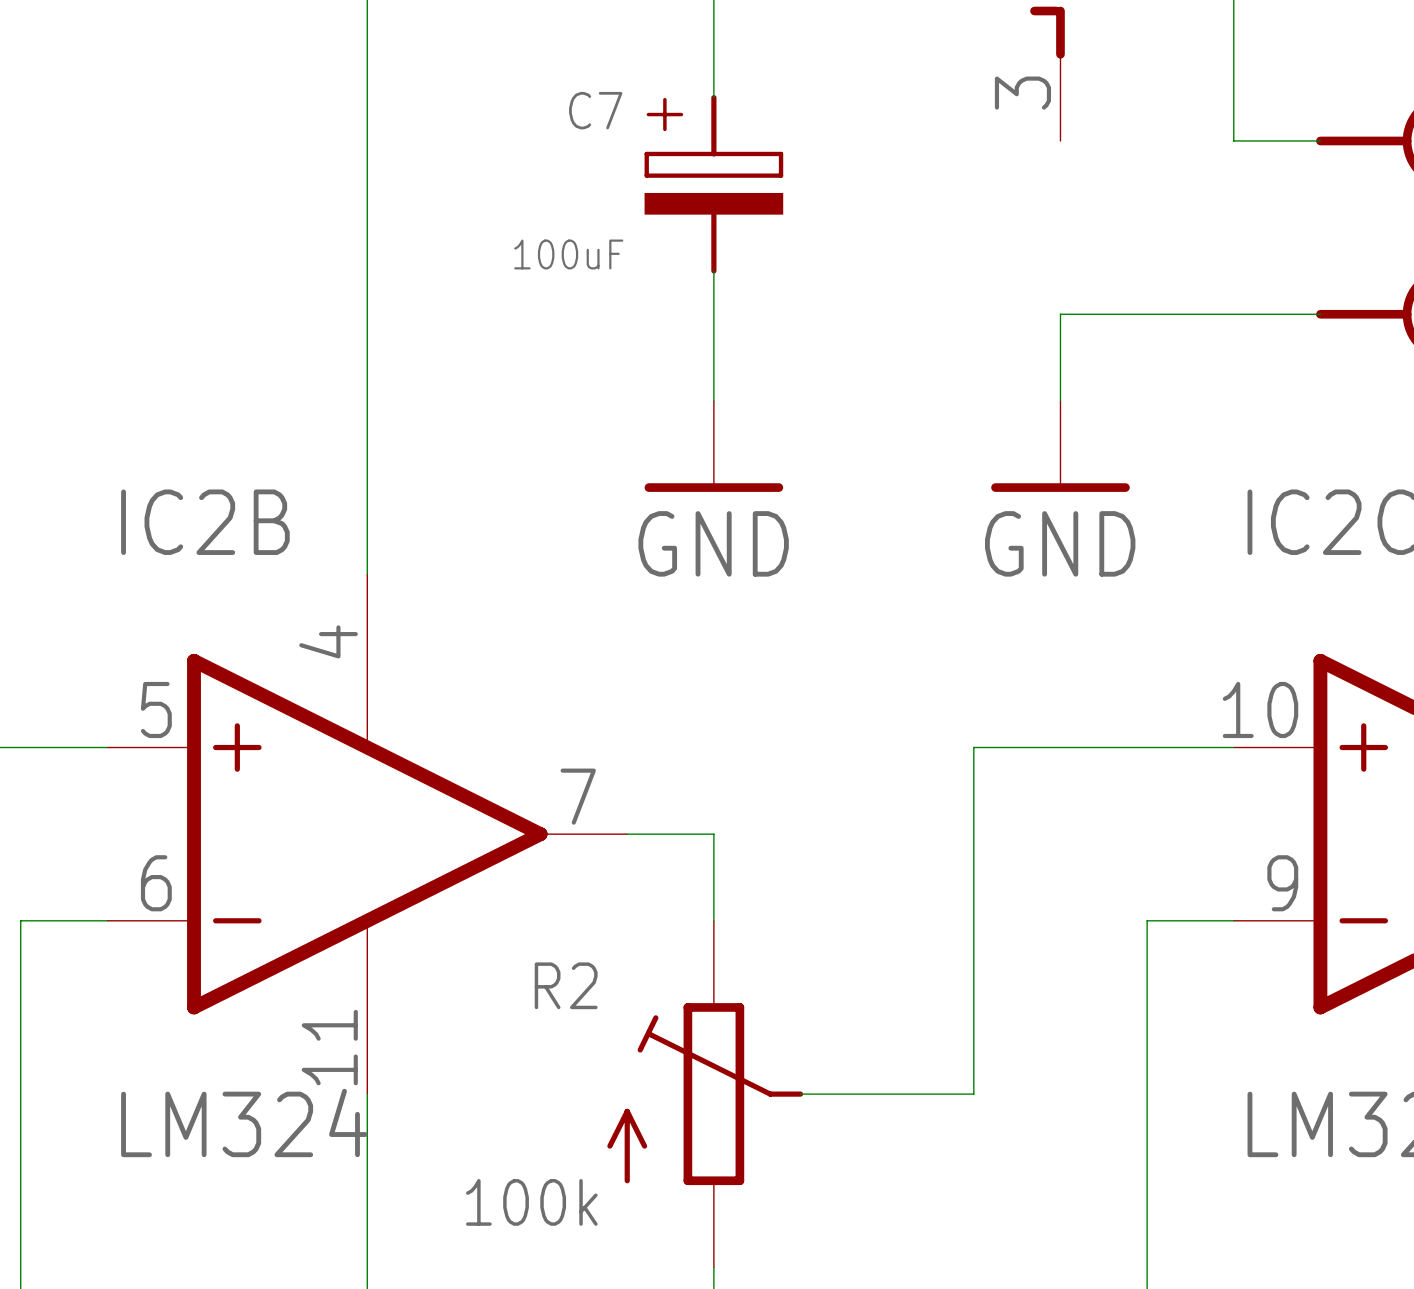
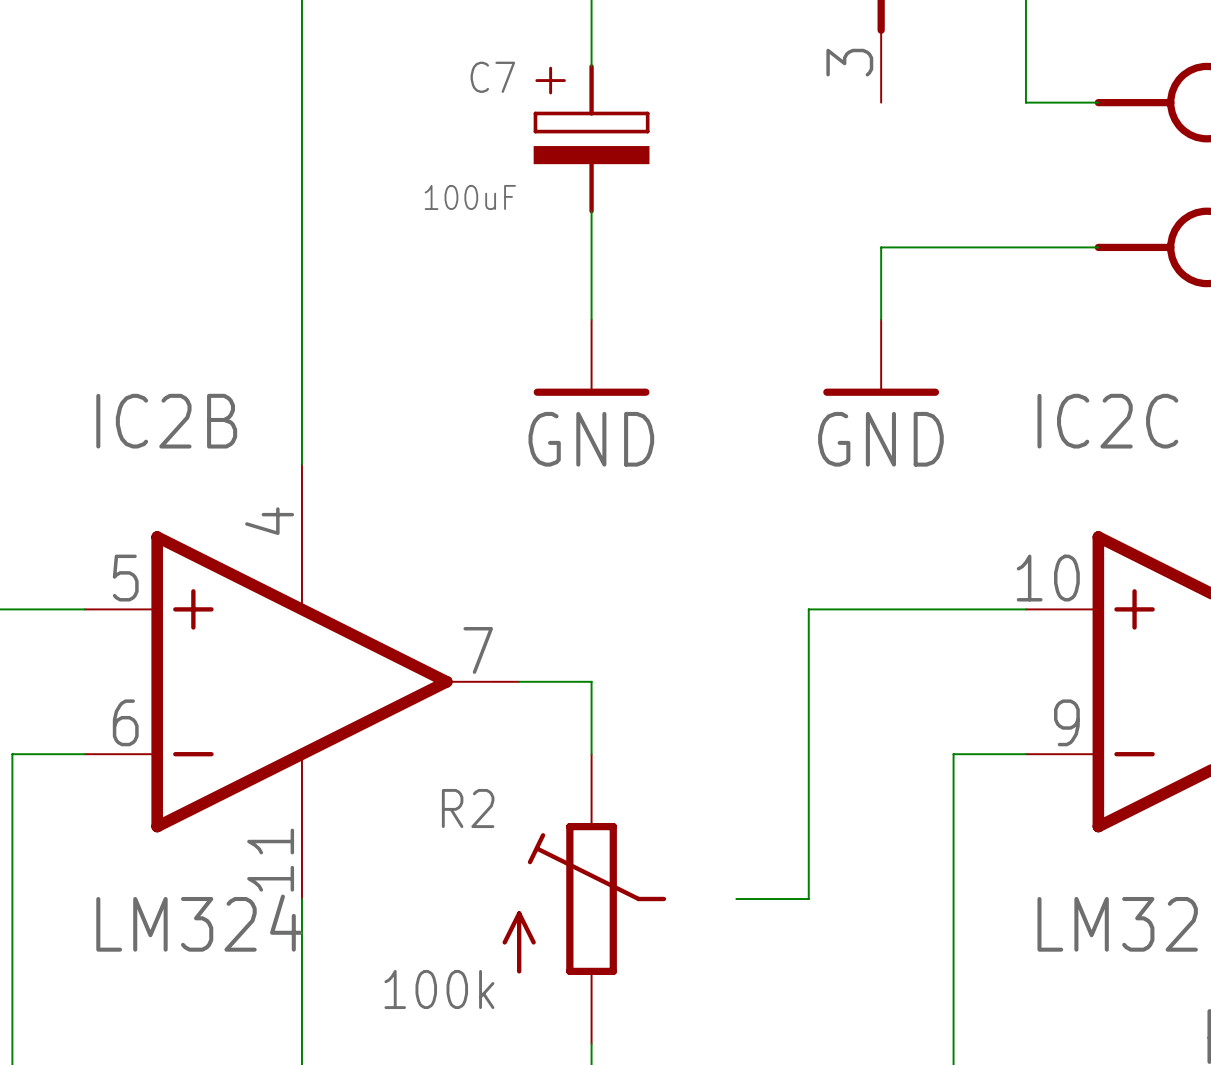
wire: (800, 1094) (887, 1094) -> none

